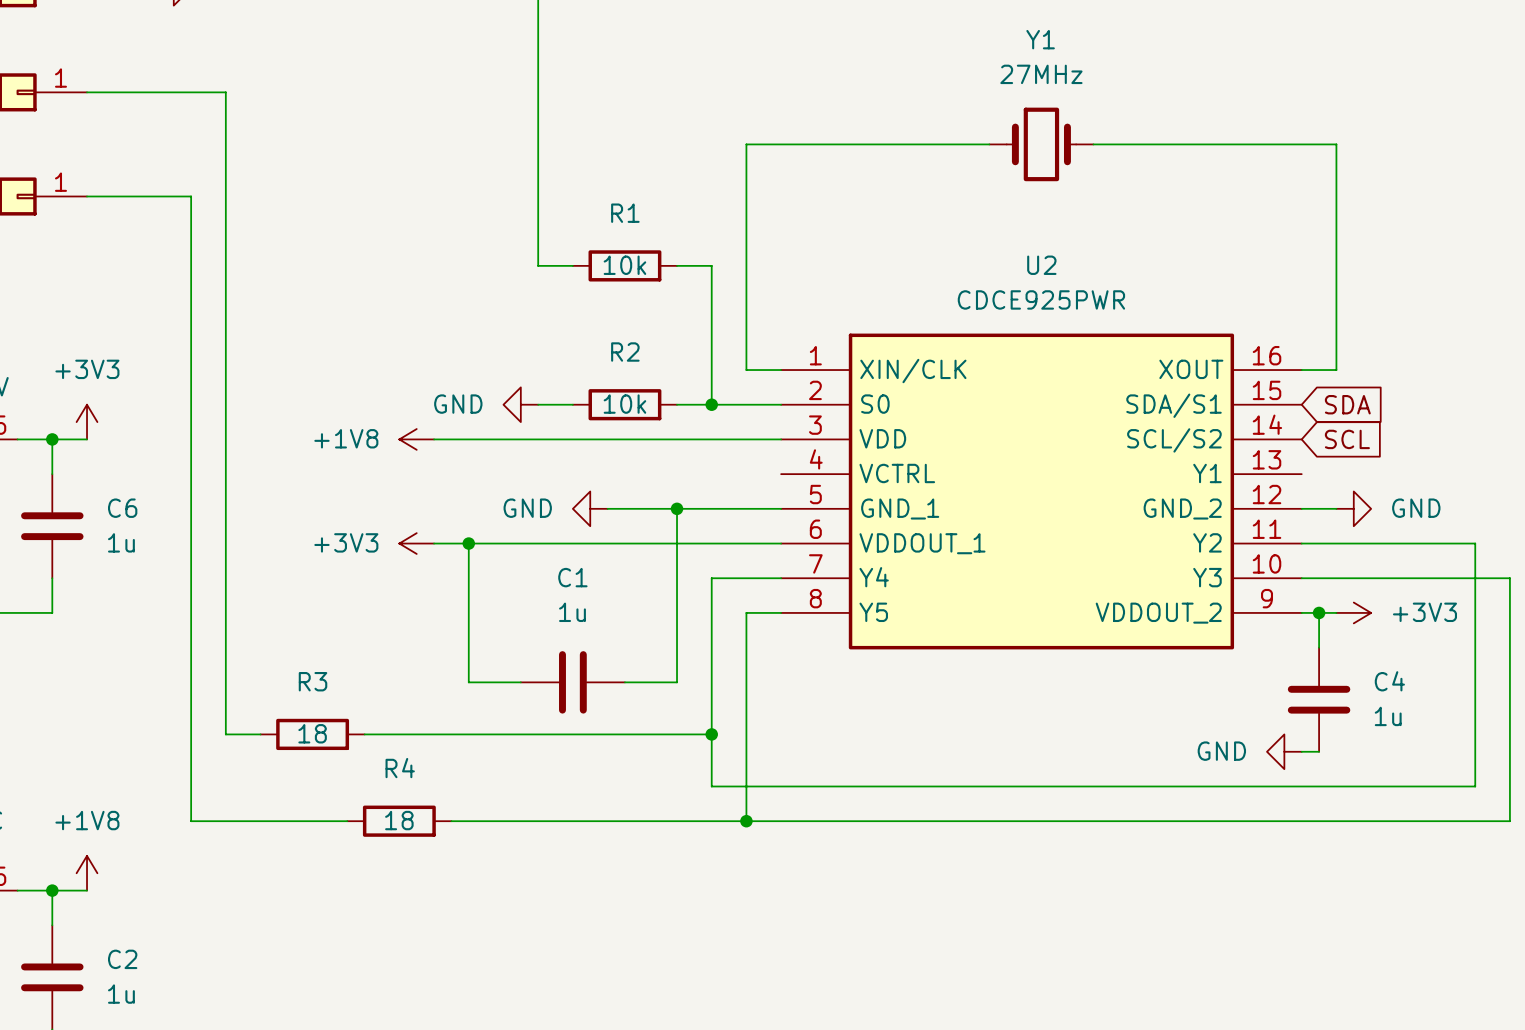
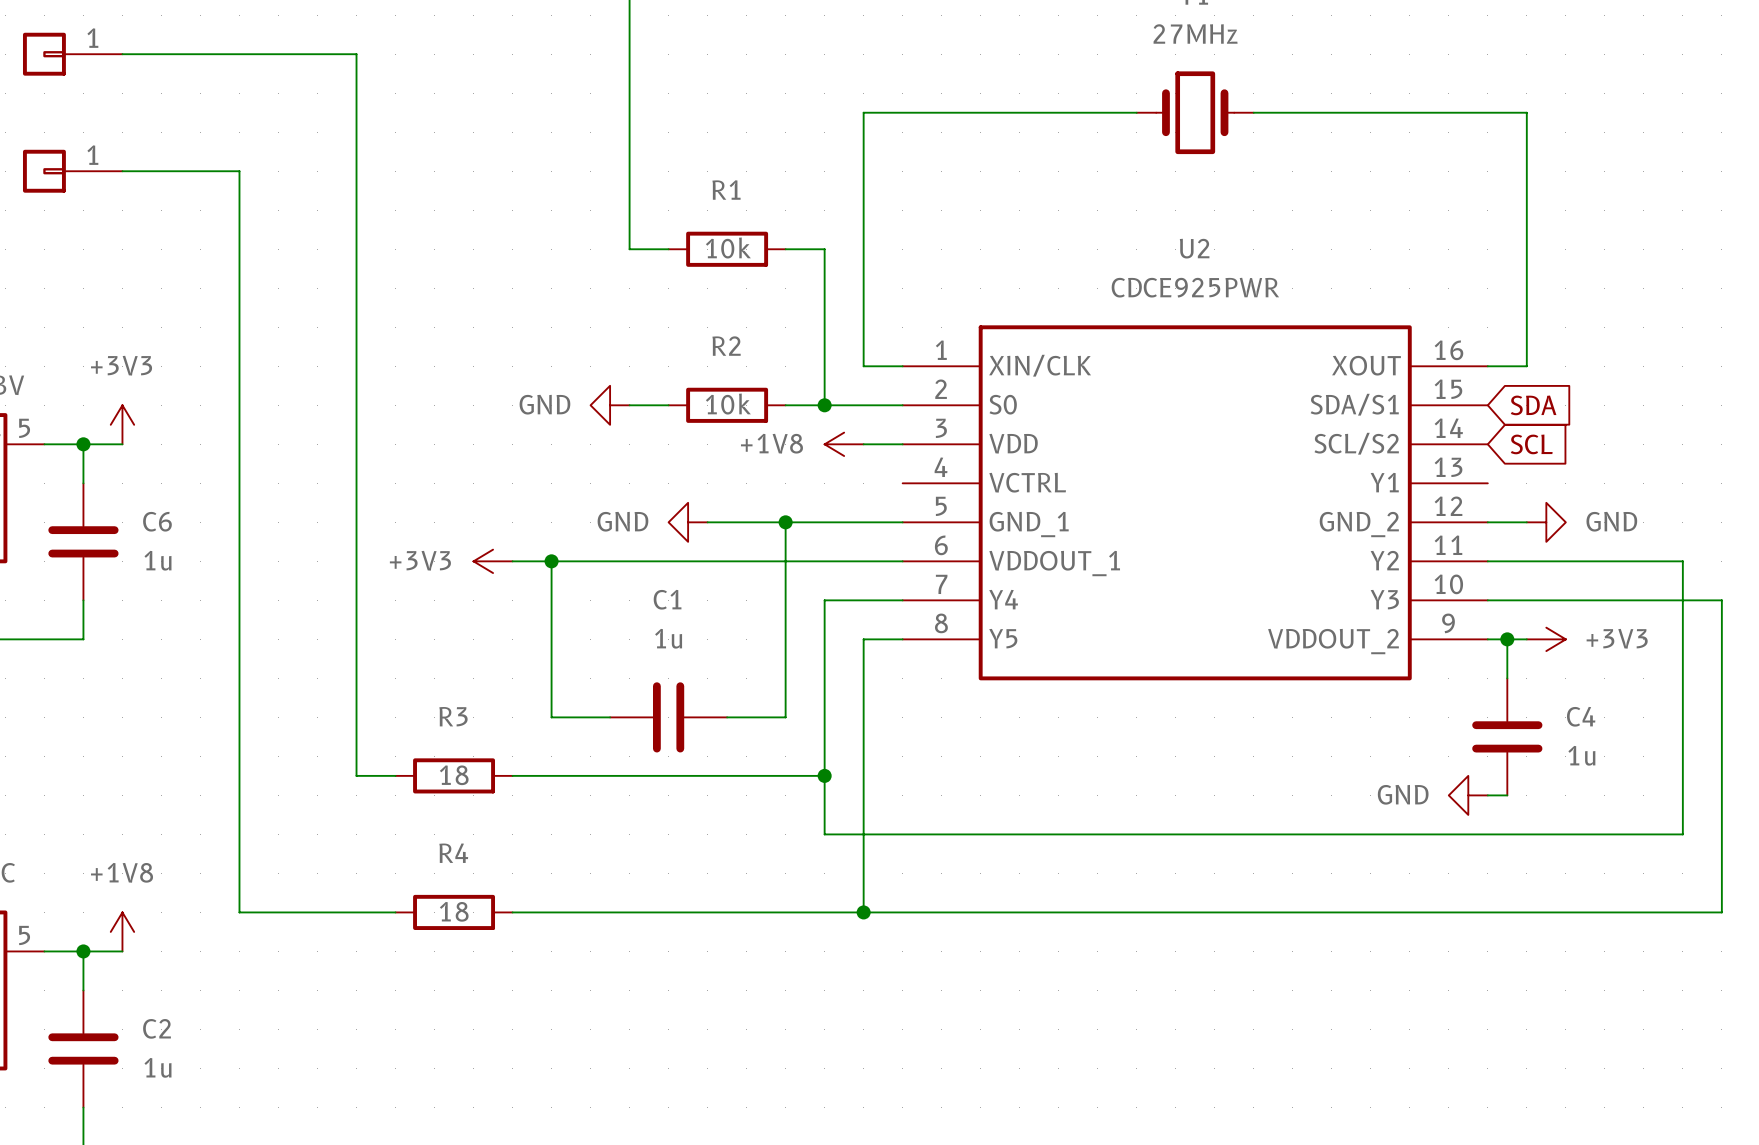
wire: (225, 92) (225, 734) (260, 734) -> (278, 54) (356, 54) (356, 775) (395, 775)
power symbol position: +1V8 (416, 439) -> +1V8 (844, 444)
wire: (434, 439) (746, 439) -> none
R3 position: (312, 734) -> (454, 775)
wire: (364, 734) (434, 734) -> none
wire: (191, 821) (347, 821) -> (239, 873) (239, 912) (395, 912)
R4 position: (399, 821) -> (454, 912)
wire: (451, 821) (1509, 821) -> (512, 912) (1721, 912) (1721, 873)
wire: none -> (863, 873) (863, 912)
junction position: (746, 821) -> (863, 912)

